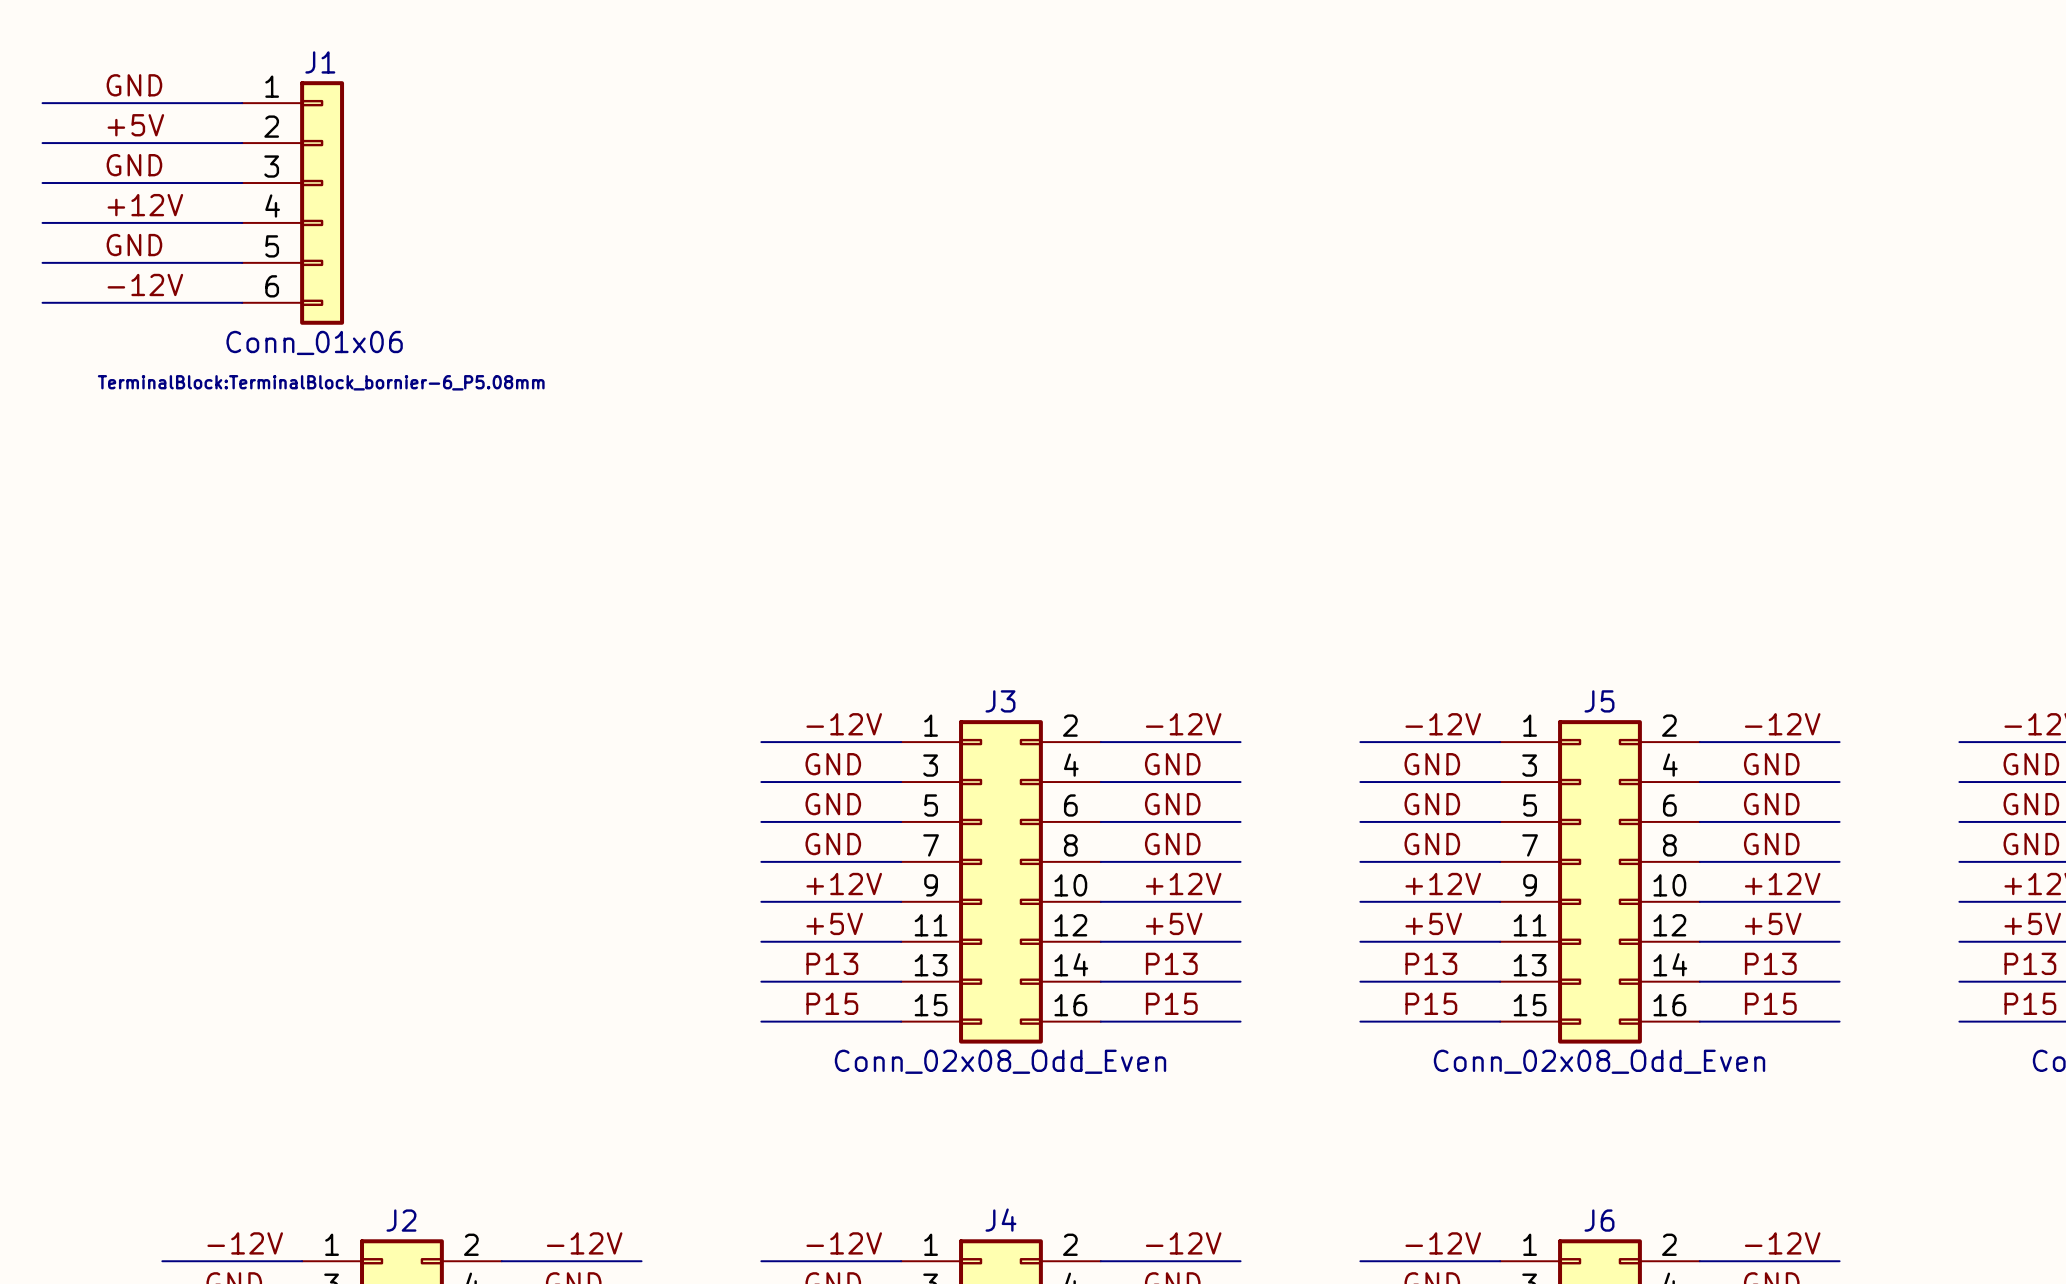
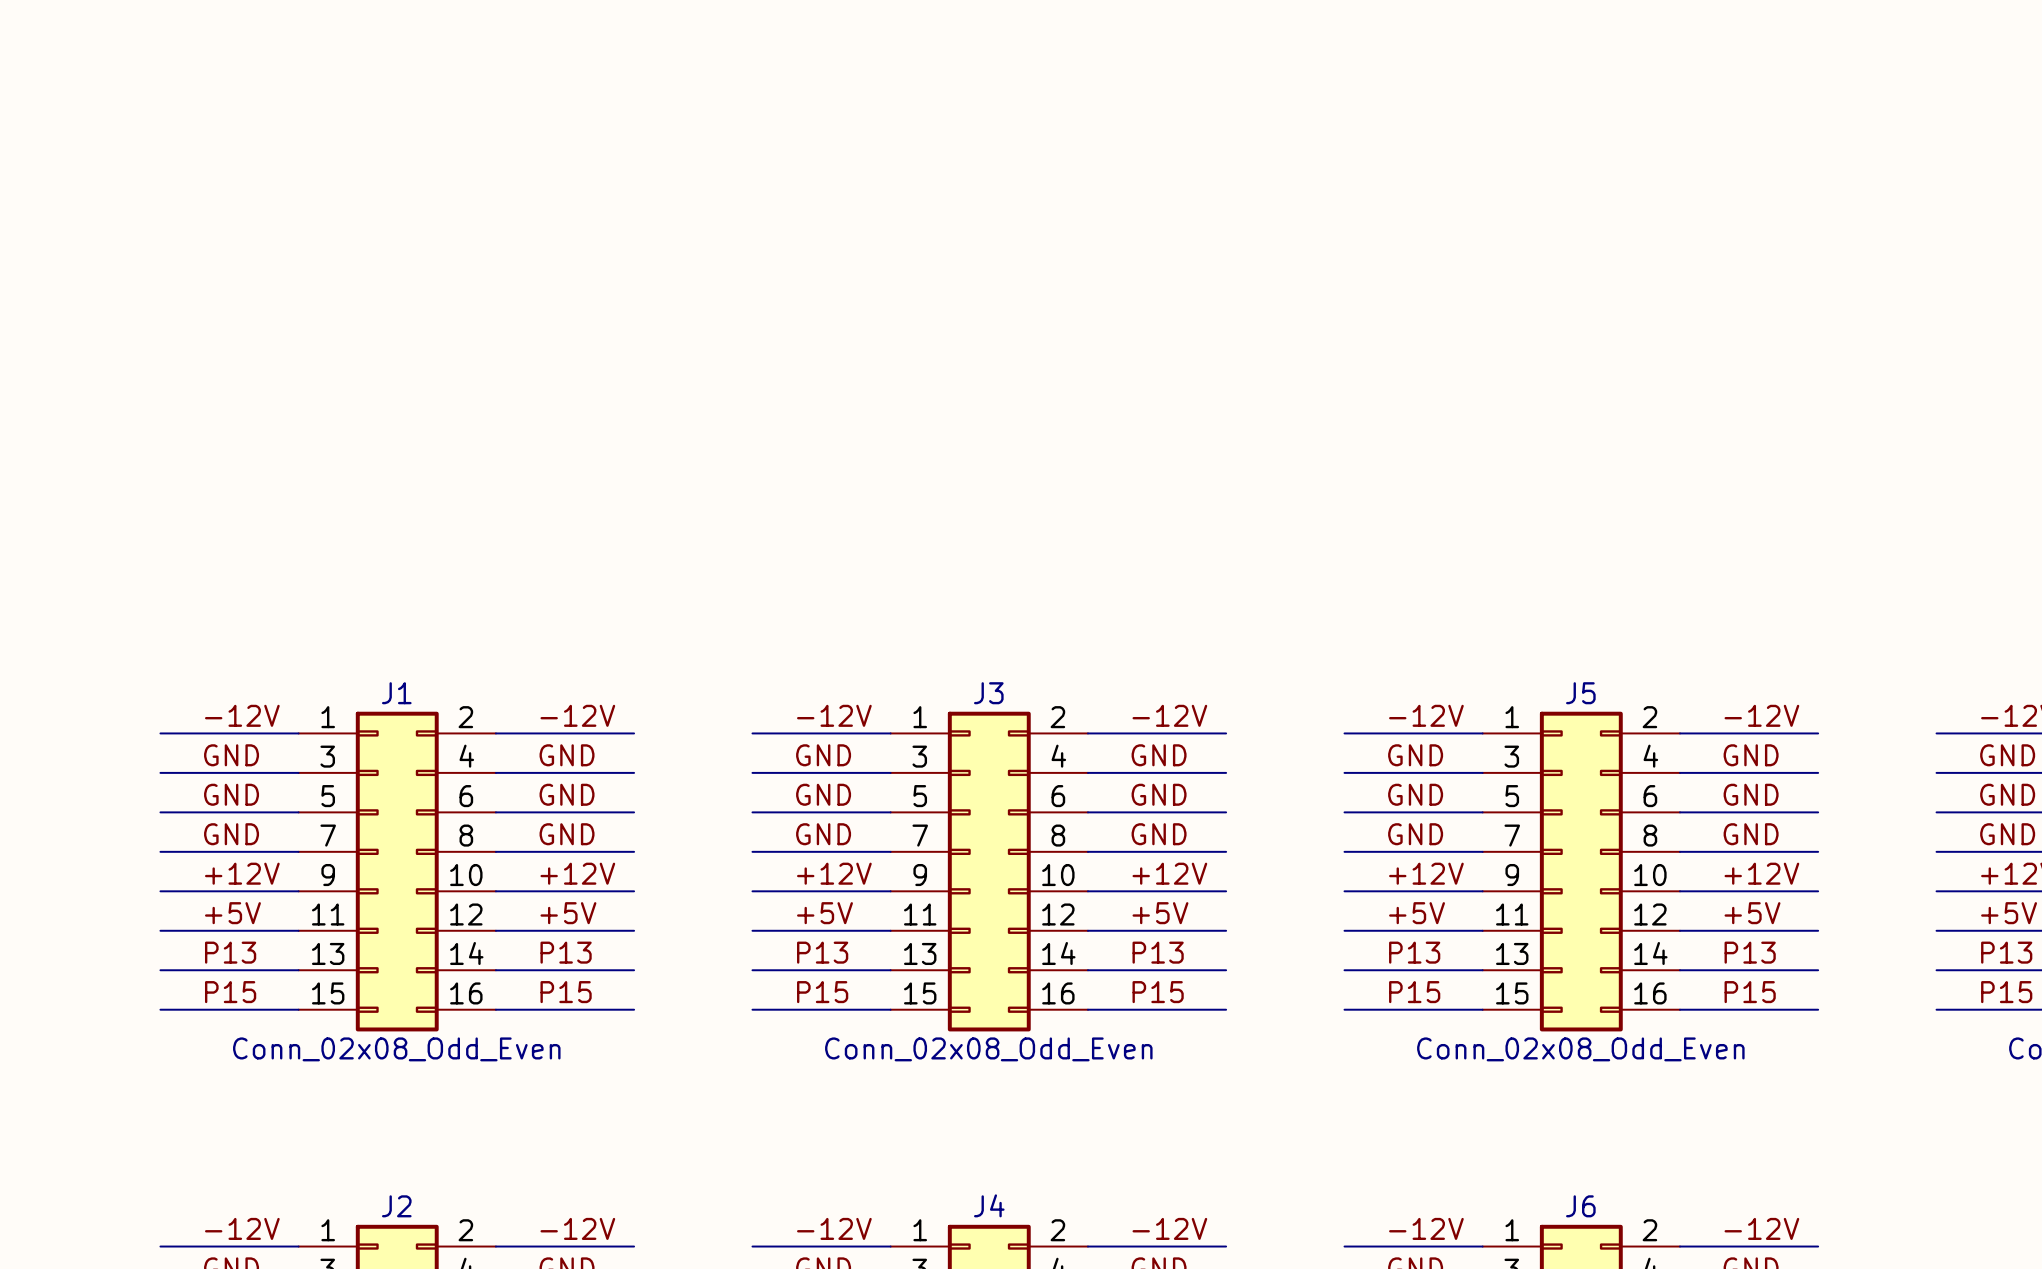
J1 name position: J1 (320, 62) -> J1 (396, 693)
J1 symbol: [242, 81, 345, 325] -> [298, 711, 496, 1032]
label: GND (134, 85) -> none
wire: (42, 103) (242, 103) -> none
label: +5V (135, 125) -> none
wire: (42, 143) (242, 143) -> none
label: GND (134, 165) -> none
wire: (42, 183) (242, 183) -> none
label: +12V (145, 205) -> none
wire: (42, 222) (242, 222) -> none
label: GND (134, 245) -> none
wire: (42, 262) (242, 262) -> none
label: -12V (145, 284) -> none
wire: (42, 302) (242, 302) -> none
J1 value: Conn_01x06 (314, 342) -> Conn_02x08_Odd_Even (396, 1049)
J1 text: TerminalBlock:TerminalBlock_bornier-6_P5.08mm (321, 382) -> none
label: none -> -12V (242, 715)
label: none -> -12V (577, 715)
wire: none -> (160, 733) (298, 733)
wire: none -> (495, 733) (634, 733)
label: none -> GND (231, 755)
label: none -> GND (567, 755)
wire: none -> (160, 772) (298, 772)
wire: none -> (495, 772) (634, 772)
label: none -> GND (231, 794)
label: none -> GND (567, 794)
wire: none -> (160, 812) (298, 812)
wire: none -> (495, 812) (634, 812)
label: none -> GND (231, 834)
label: none -> GND (567, 834)
wire: none -> (160, 851) (298, 851)
wire: none -> (495, 851) (634, 851)
label: none -> +12V (242, 873)
label: none -> +12V (577, 873)
wire: none -> (160, 891) (298, 891)
wire: none -> (495, 891) (634, 891)
label: none -> +5V (232, 913)
label: none -> +5V (568, 913)
wire: none -> (160, 930) (298, 930)
wire: none -> (495, 930) (634, 930)
label: none -> P13 (230, 952)
label: none -> P13 (566, 952)
wire: none -> (160, 970) (298, 970)
wire: none -> (495, 970) (634, 970)
label: none -> P15 (230, 992)
label: none -> P15 (566, 992)
wire: none -> (160, 1009) (298, 1009)
wire: none -> (495, 1009) (634, 1009)

